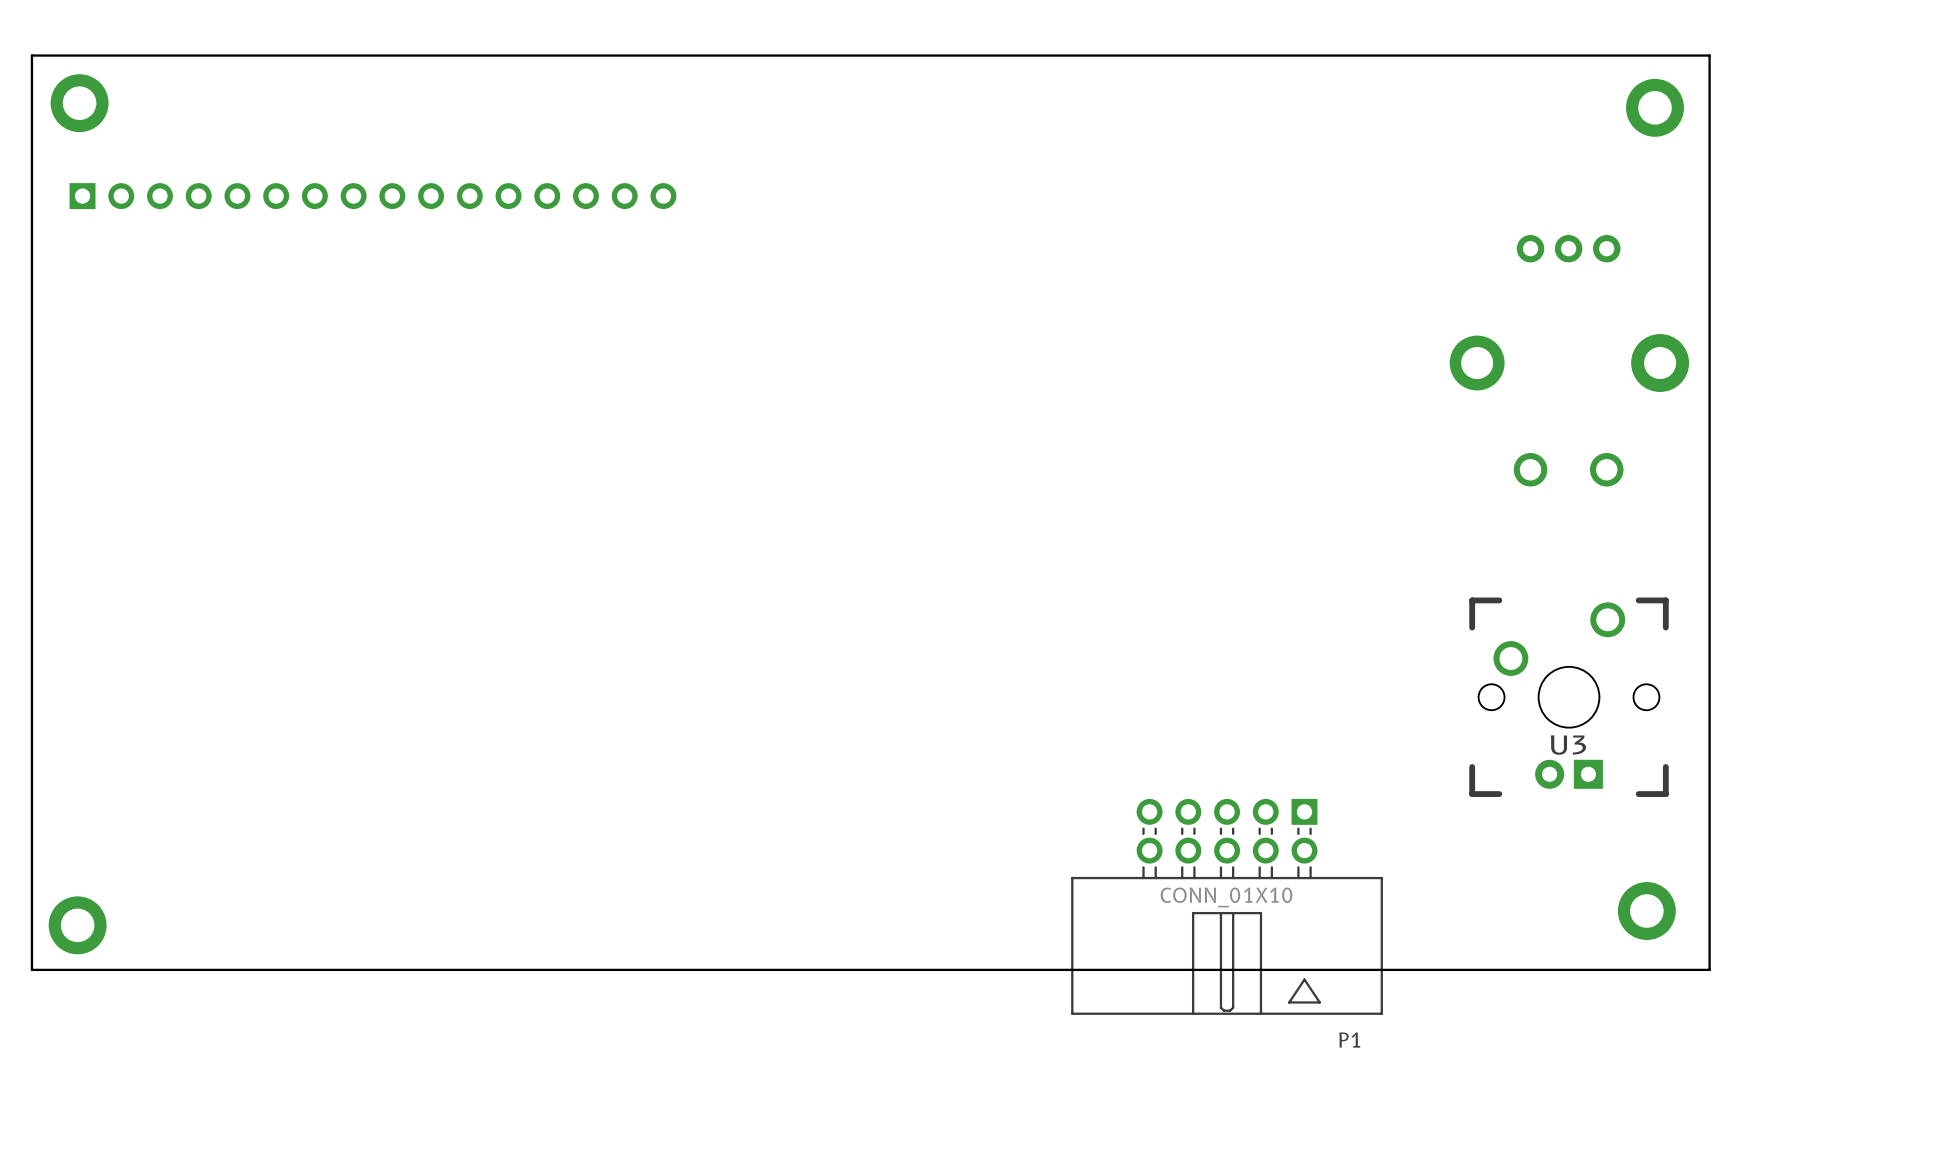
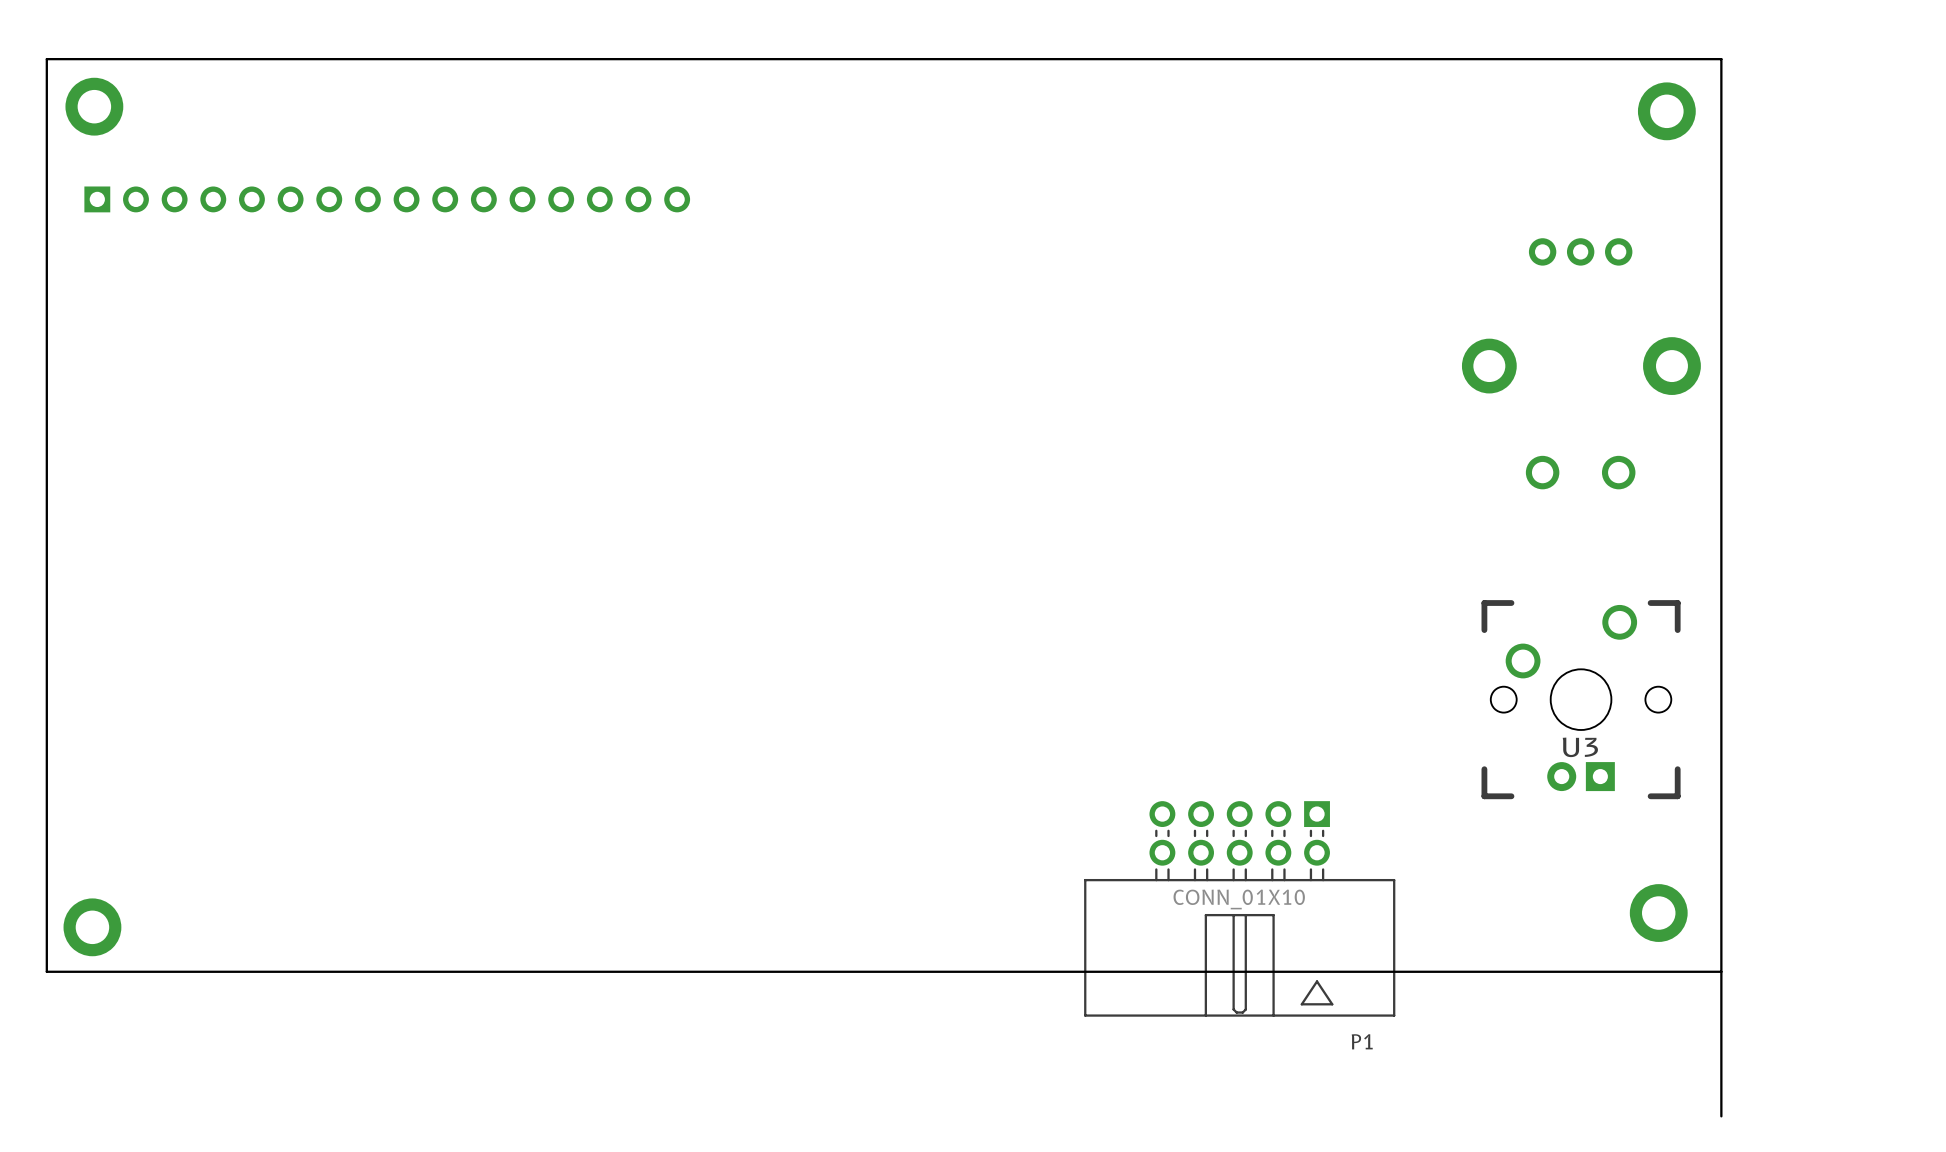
board edge: none -> (1721, 971) (1721, 1116)

